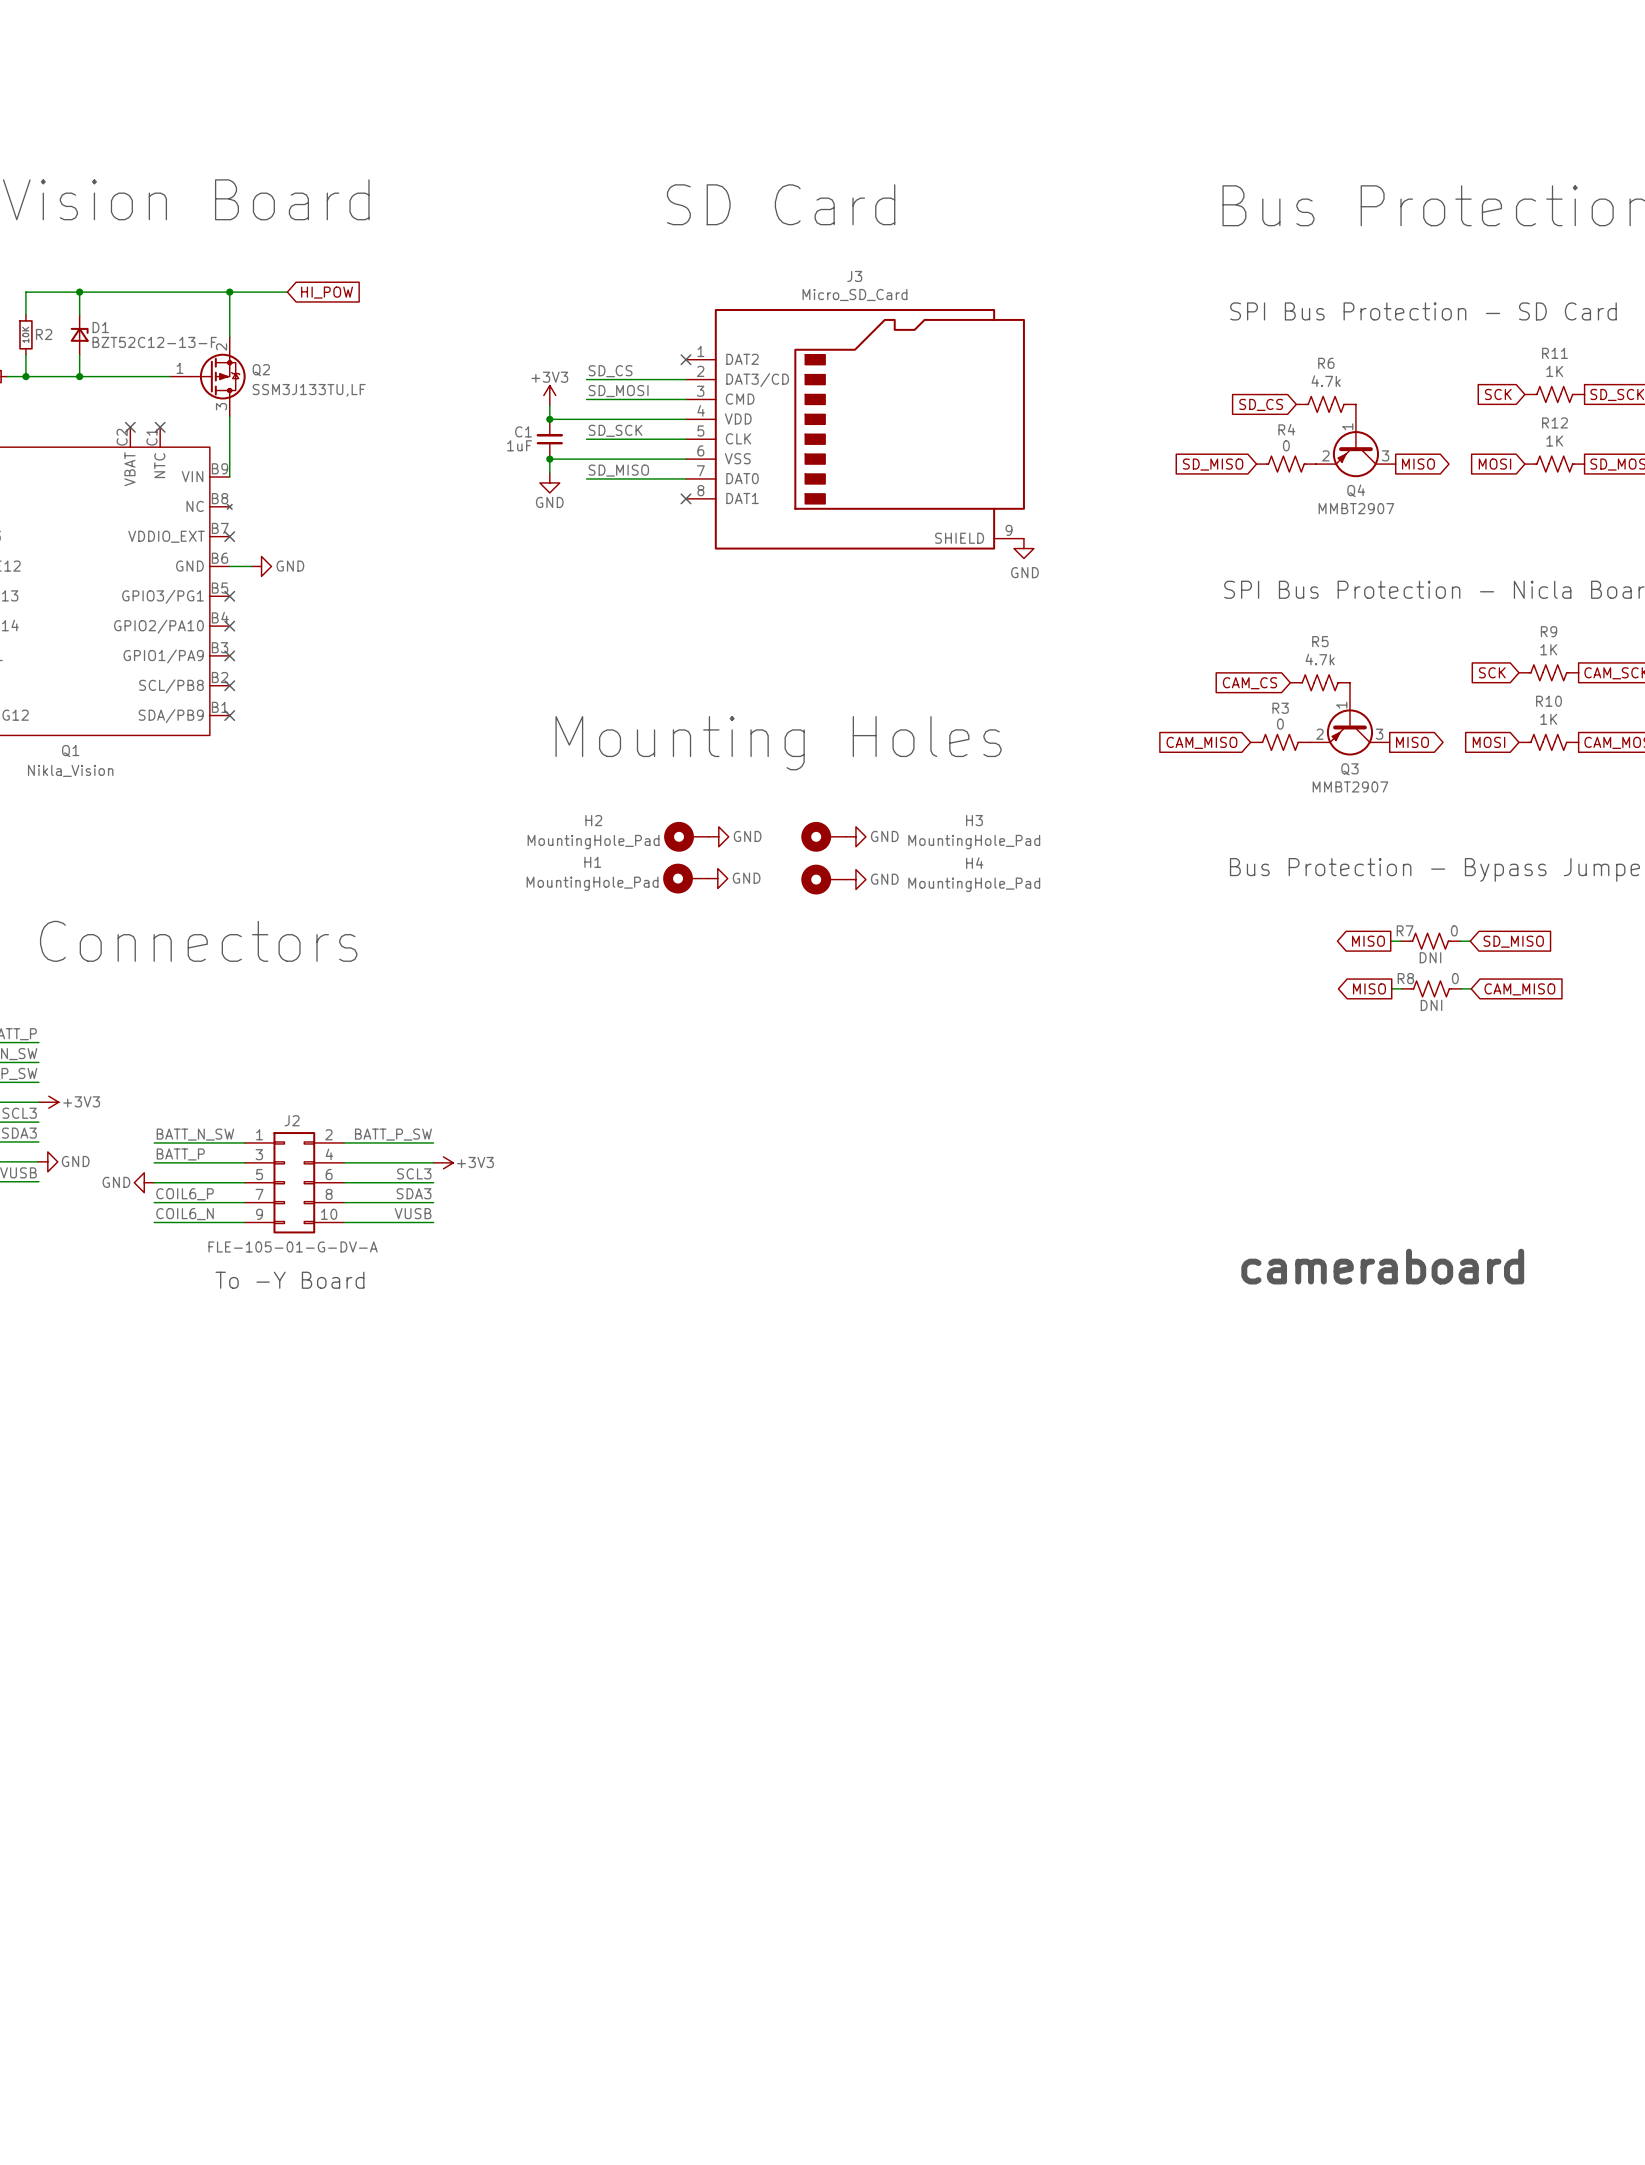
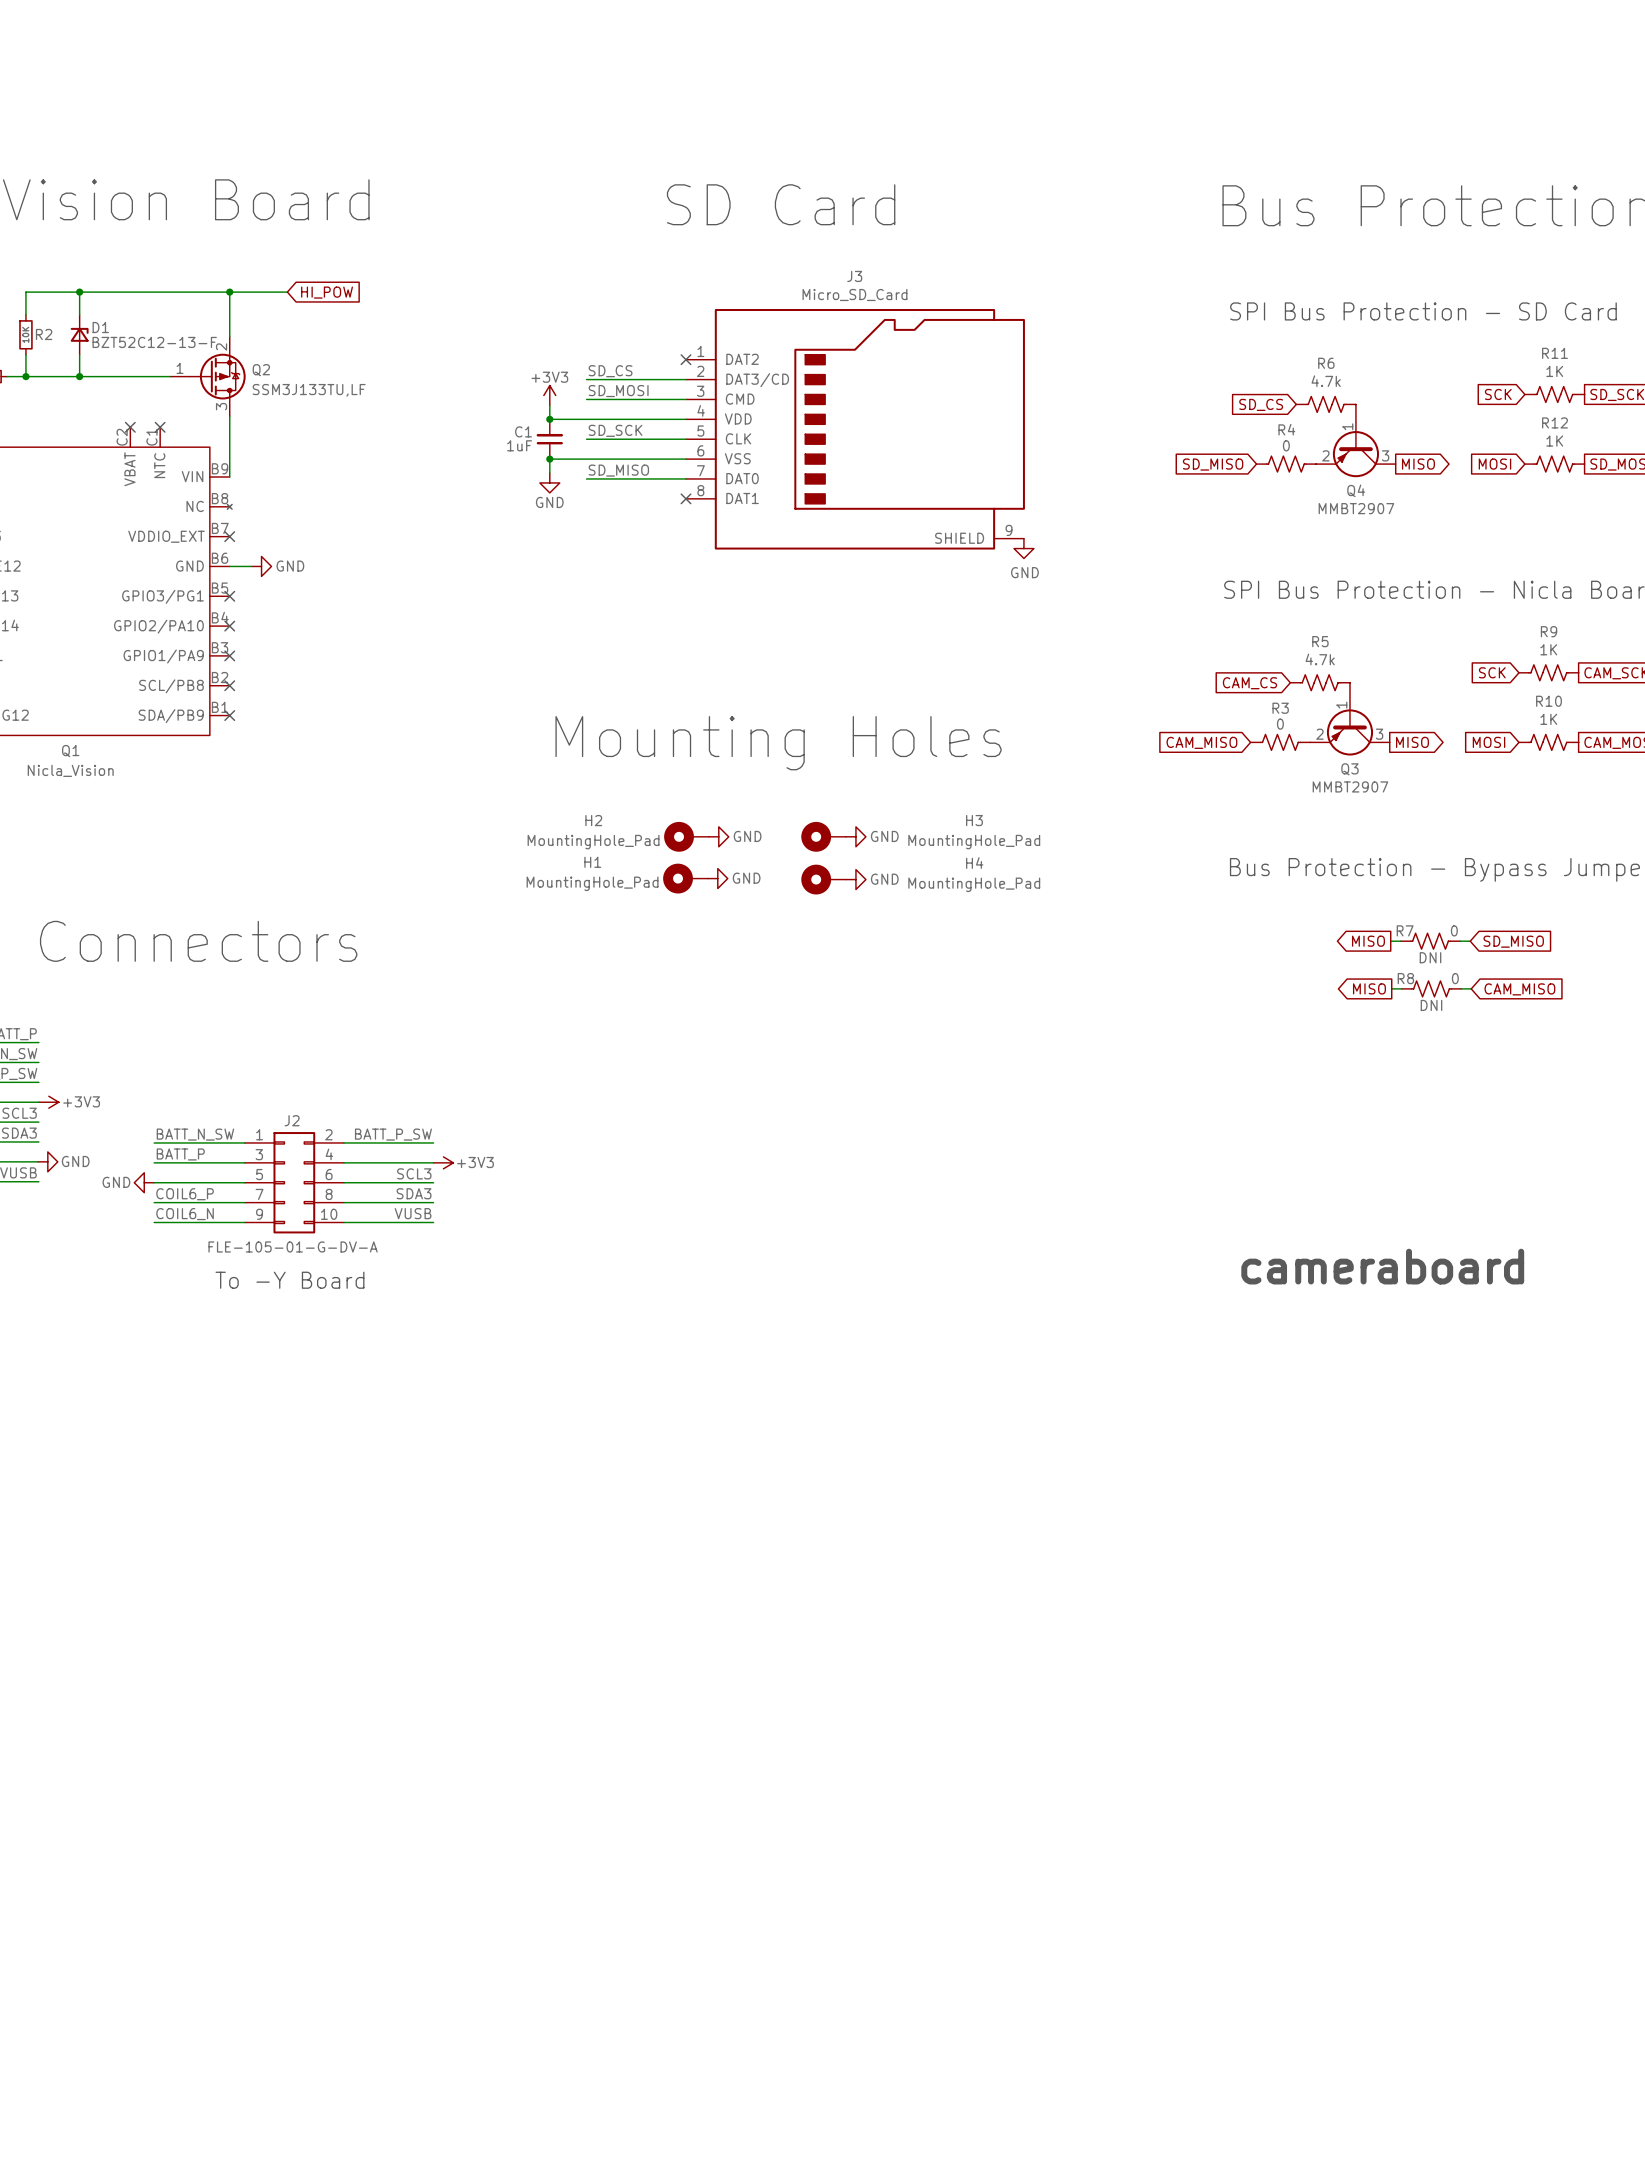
Q1 value: Nikla_Vision (70, 770) -> Nicla_Vision (70, 770)

